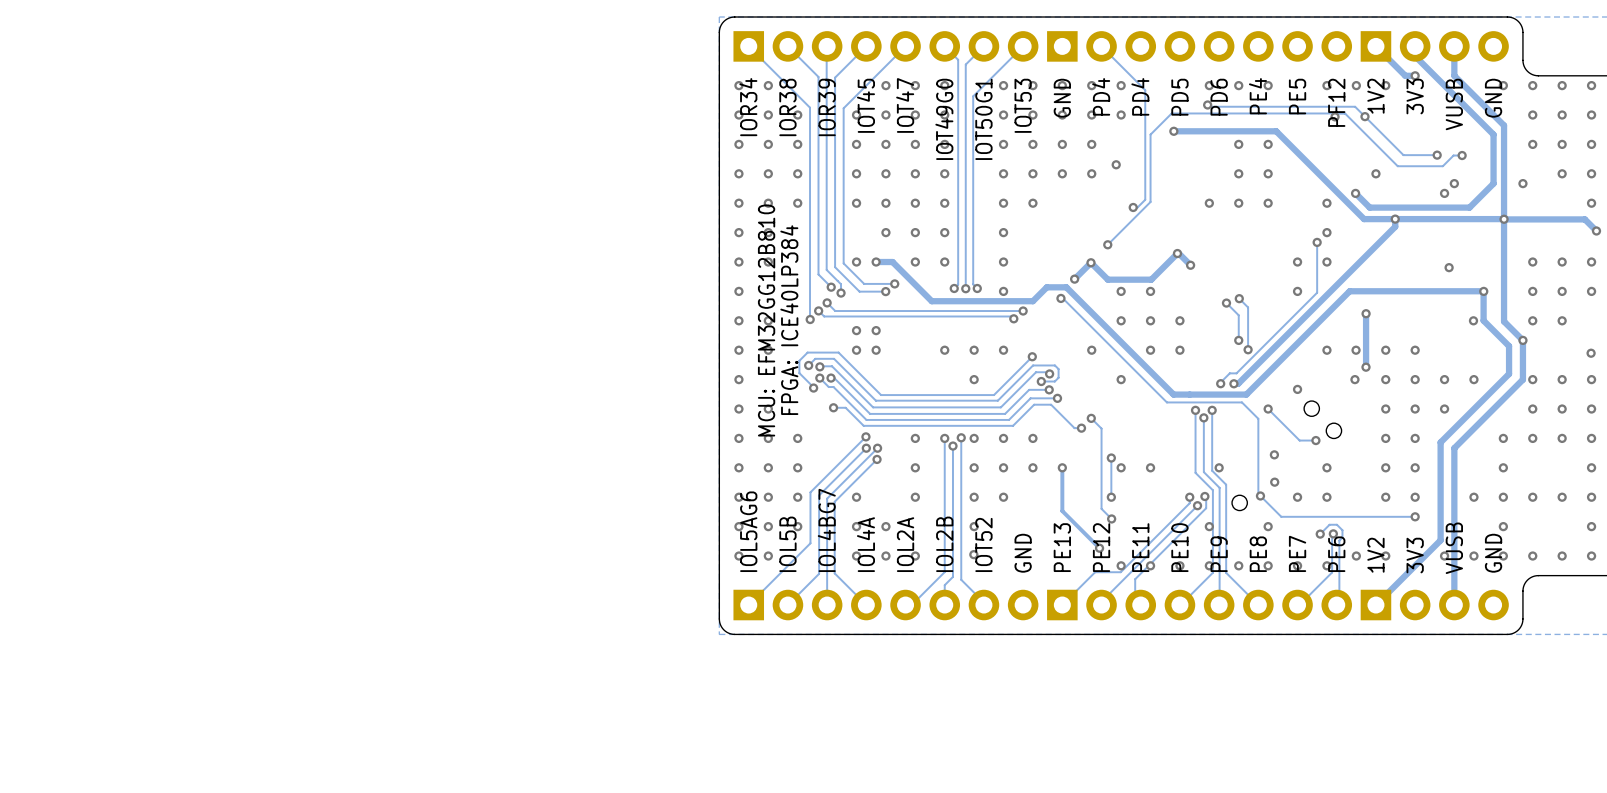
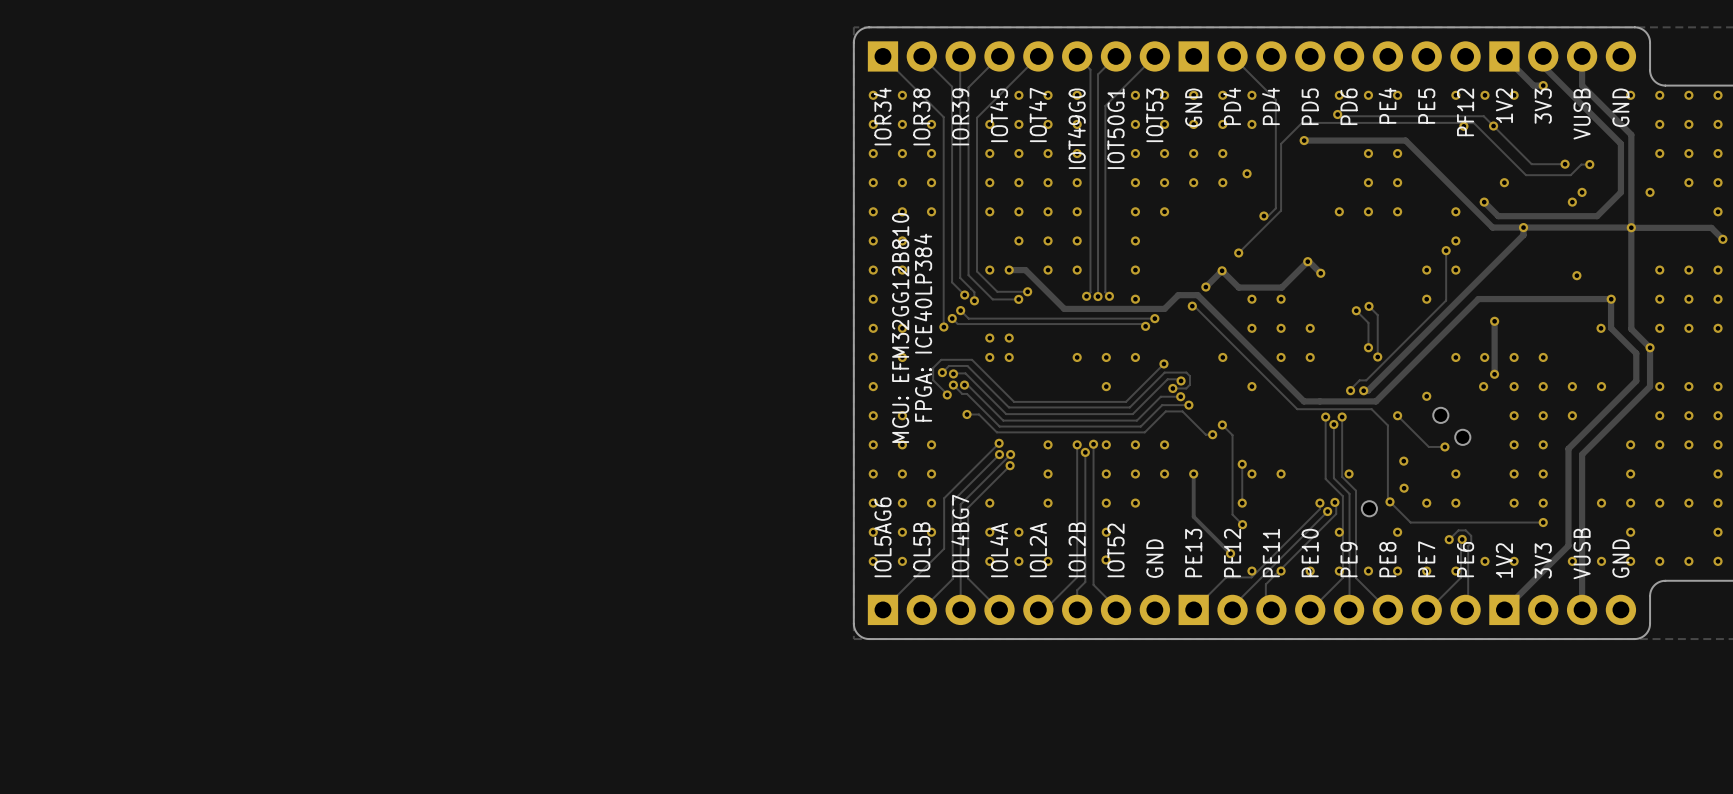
via position: (1591, 353) -> (1718, 328)

